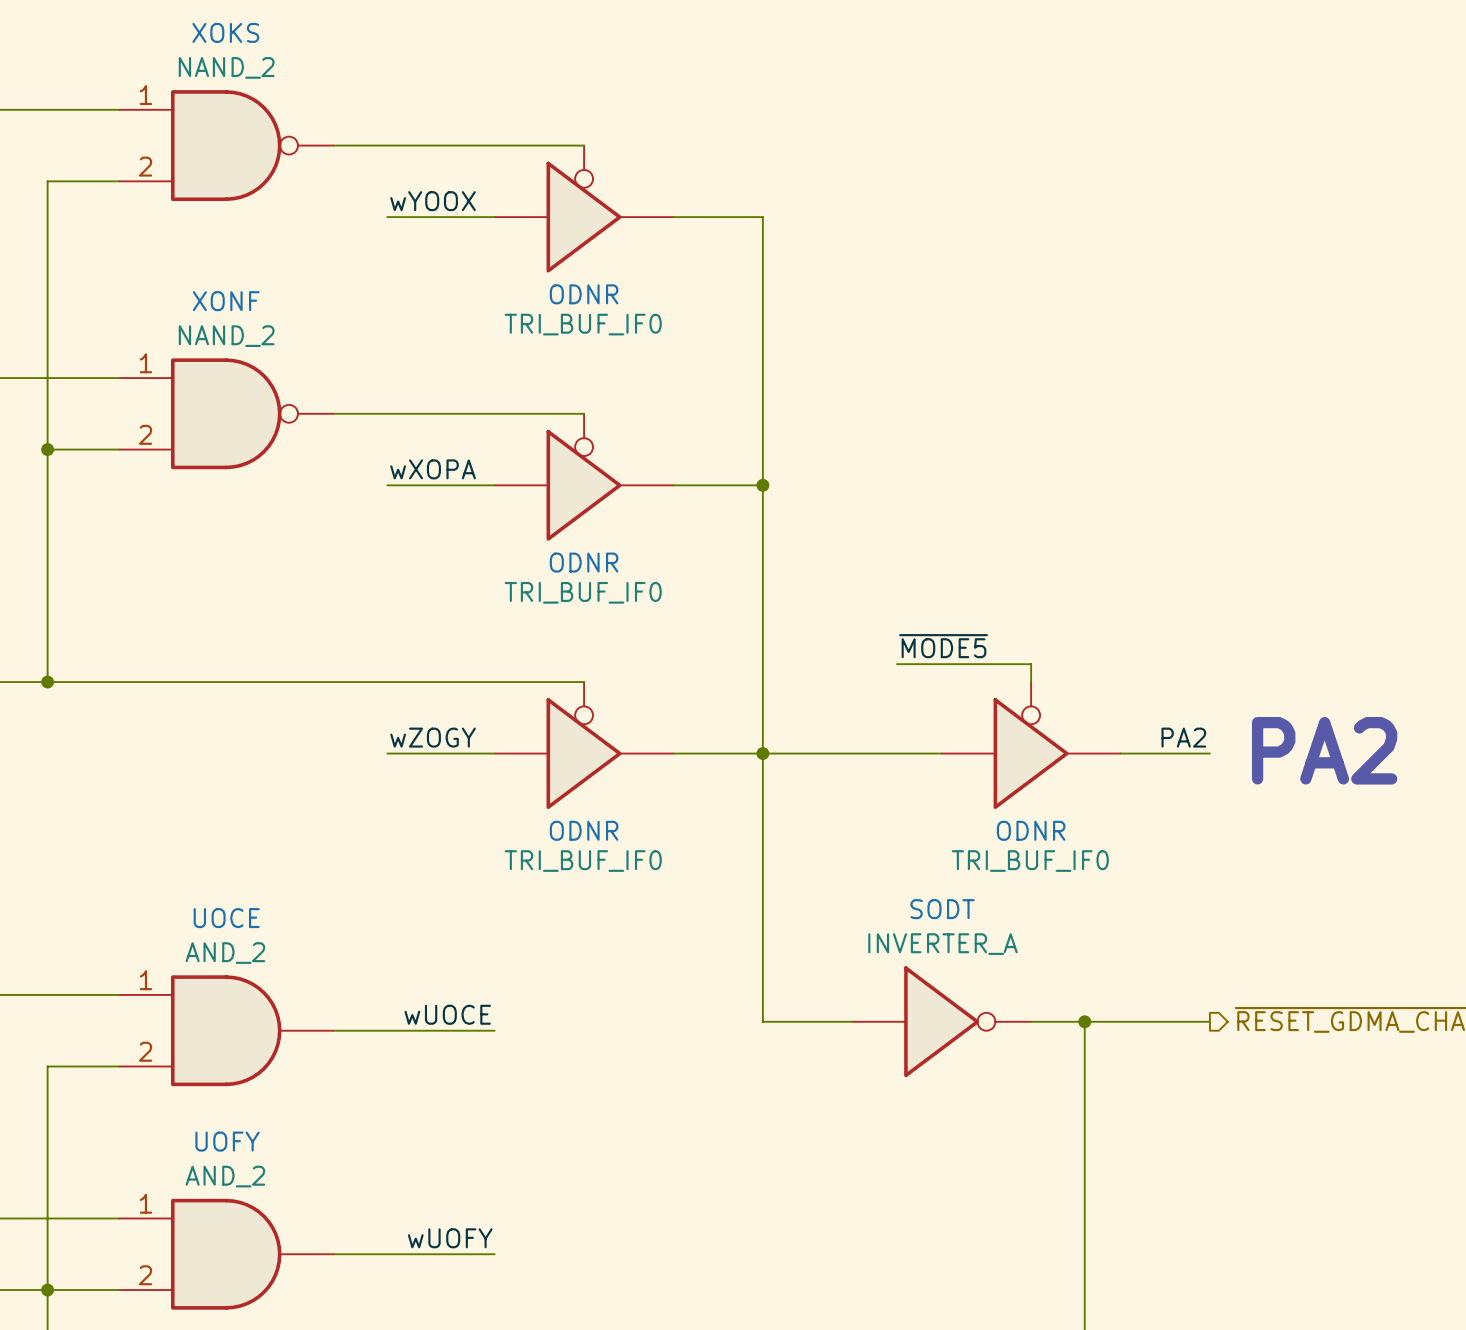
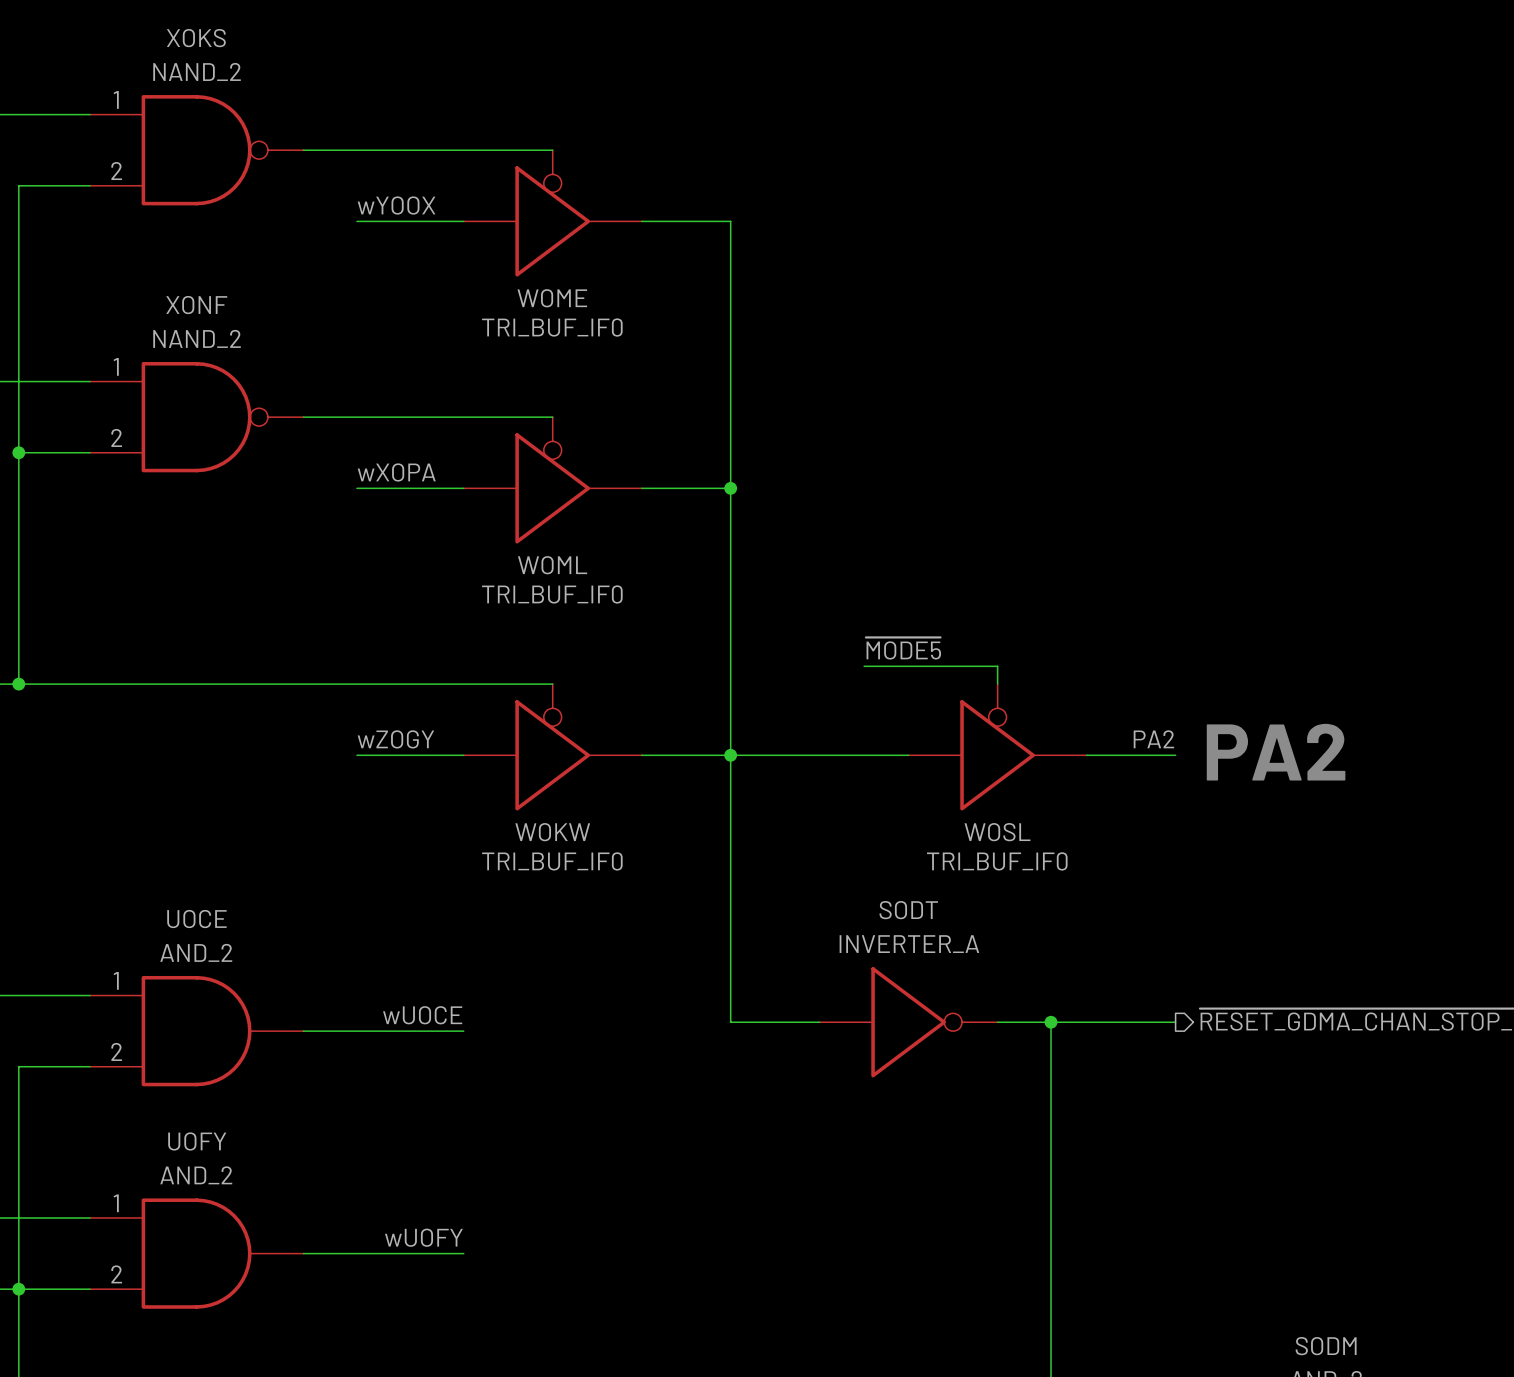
ODNR name: ODNR (584, 294) -> WOME (552, 298)
ODNR name: ODNR (584, 562) -> WOML (552, 565)
ODNR name: ODNR (584, 830) -> WOKW (552, 832)
ODNR name: ODNR (1031, 830) -> WOSL (997, 832)

